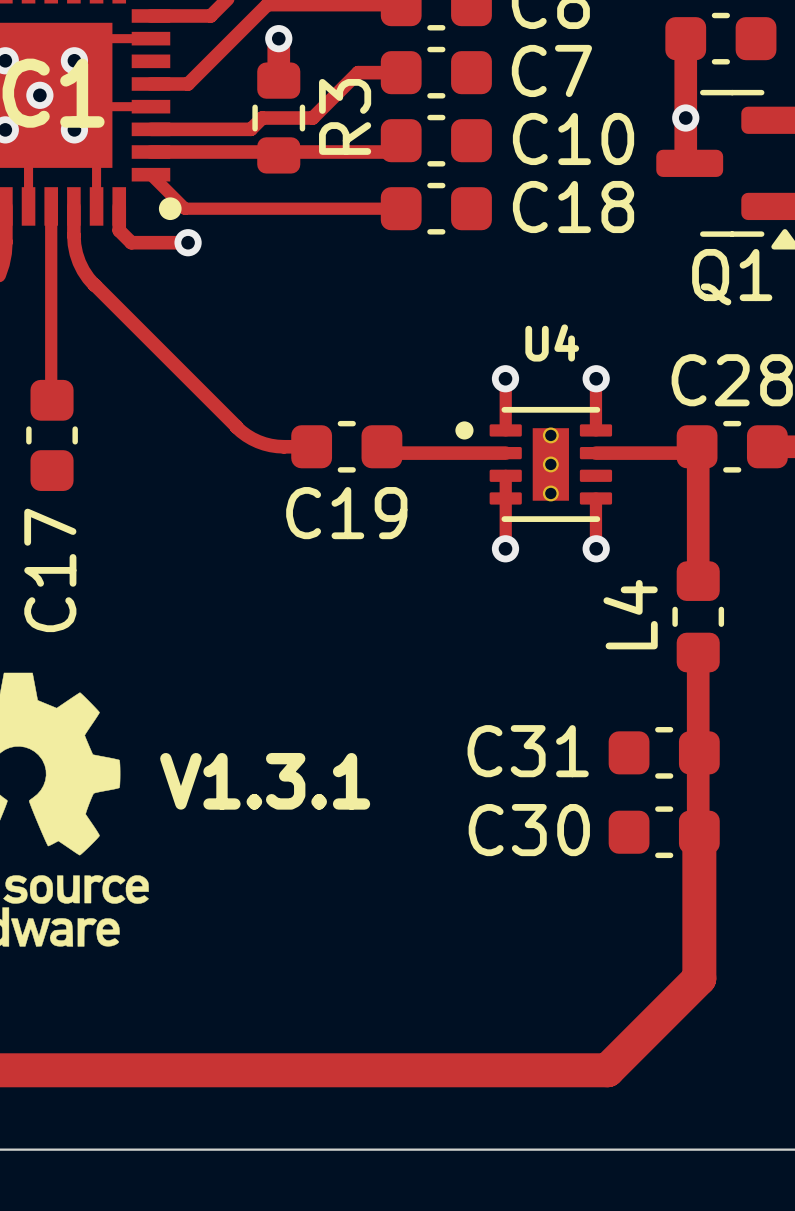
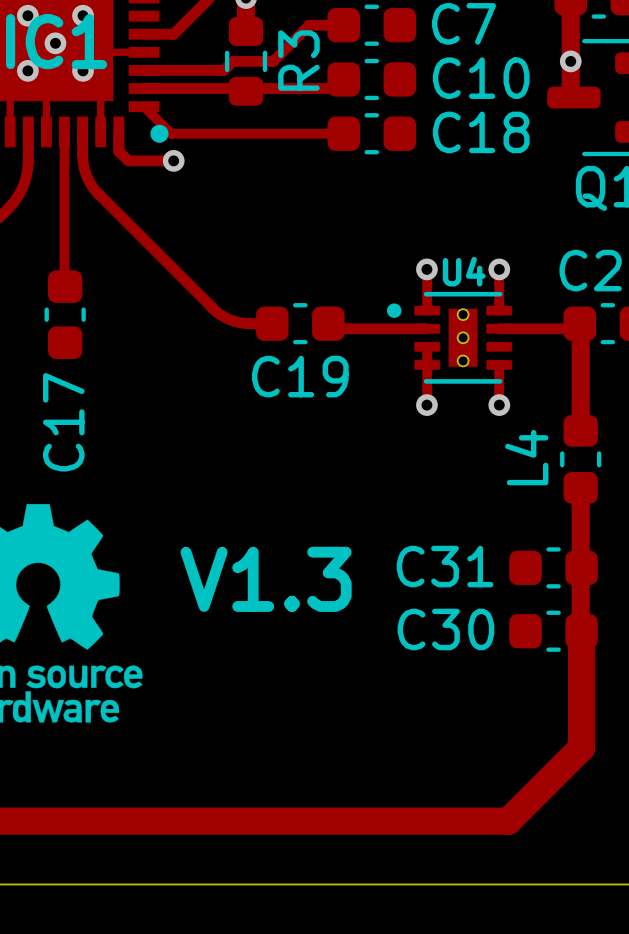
U4 name position: U4 (552, 342) -> U4 (464, 271)
text: V1.3.1 (265, 781) -> V1.3 (266, 579)

